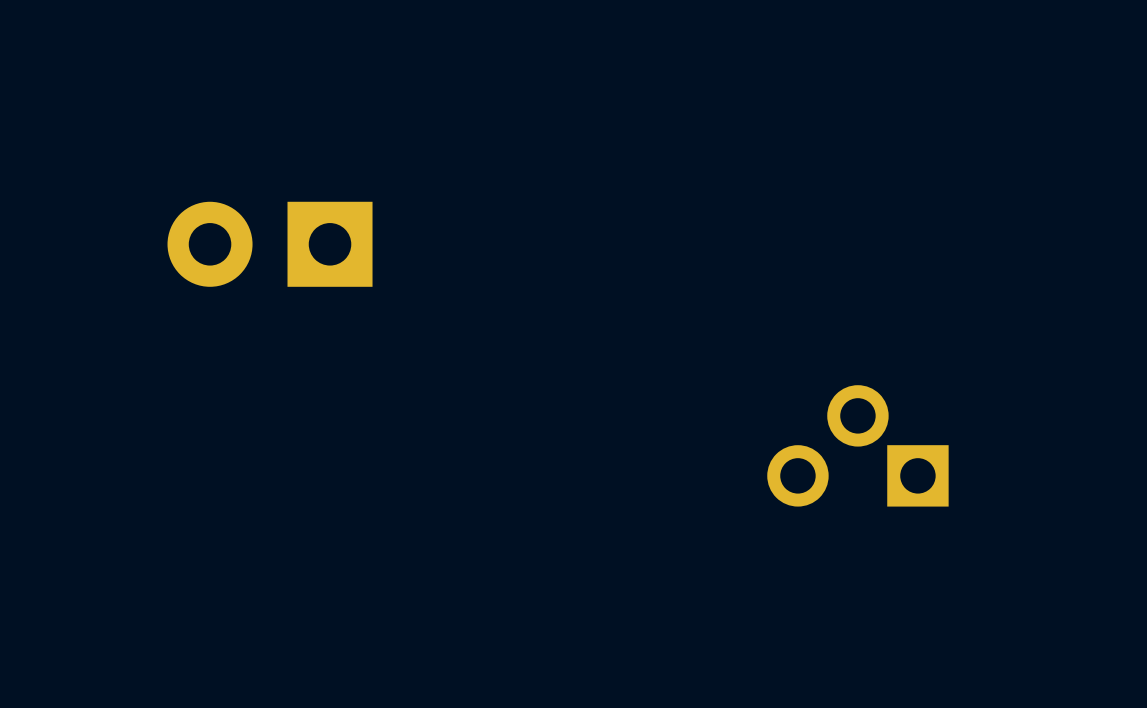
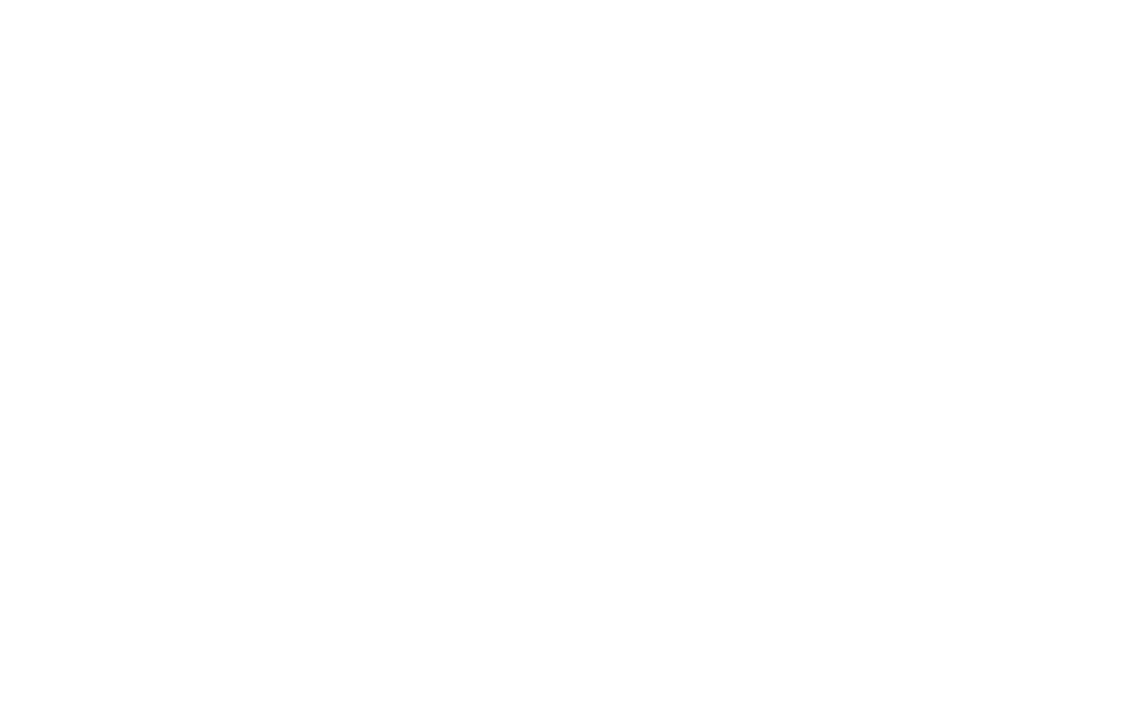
part: (270, 244) -> none
part: (857, 445) -> none

